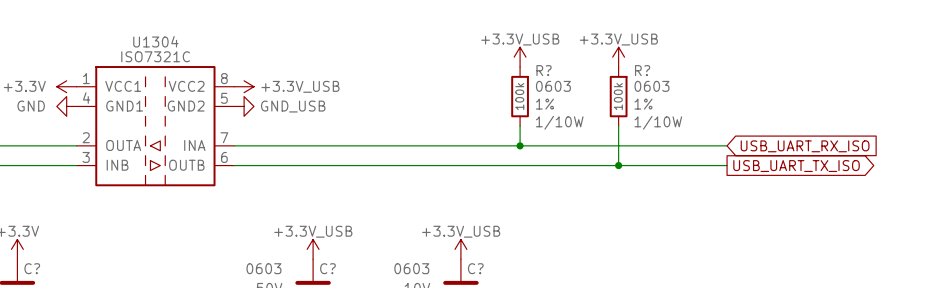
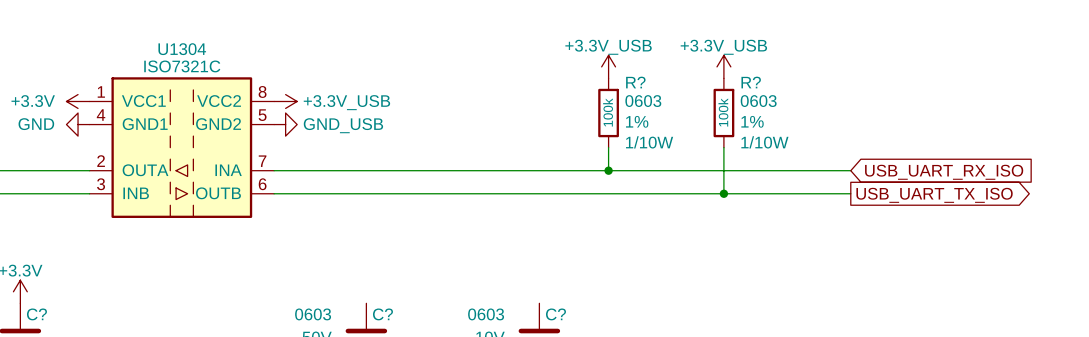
power symbol: +3.3V_USB (313, 249) -> none
power symbol: +3.3V_USB (460, 249) -> none

